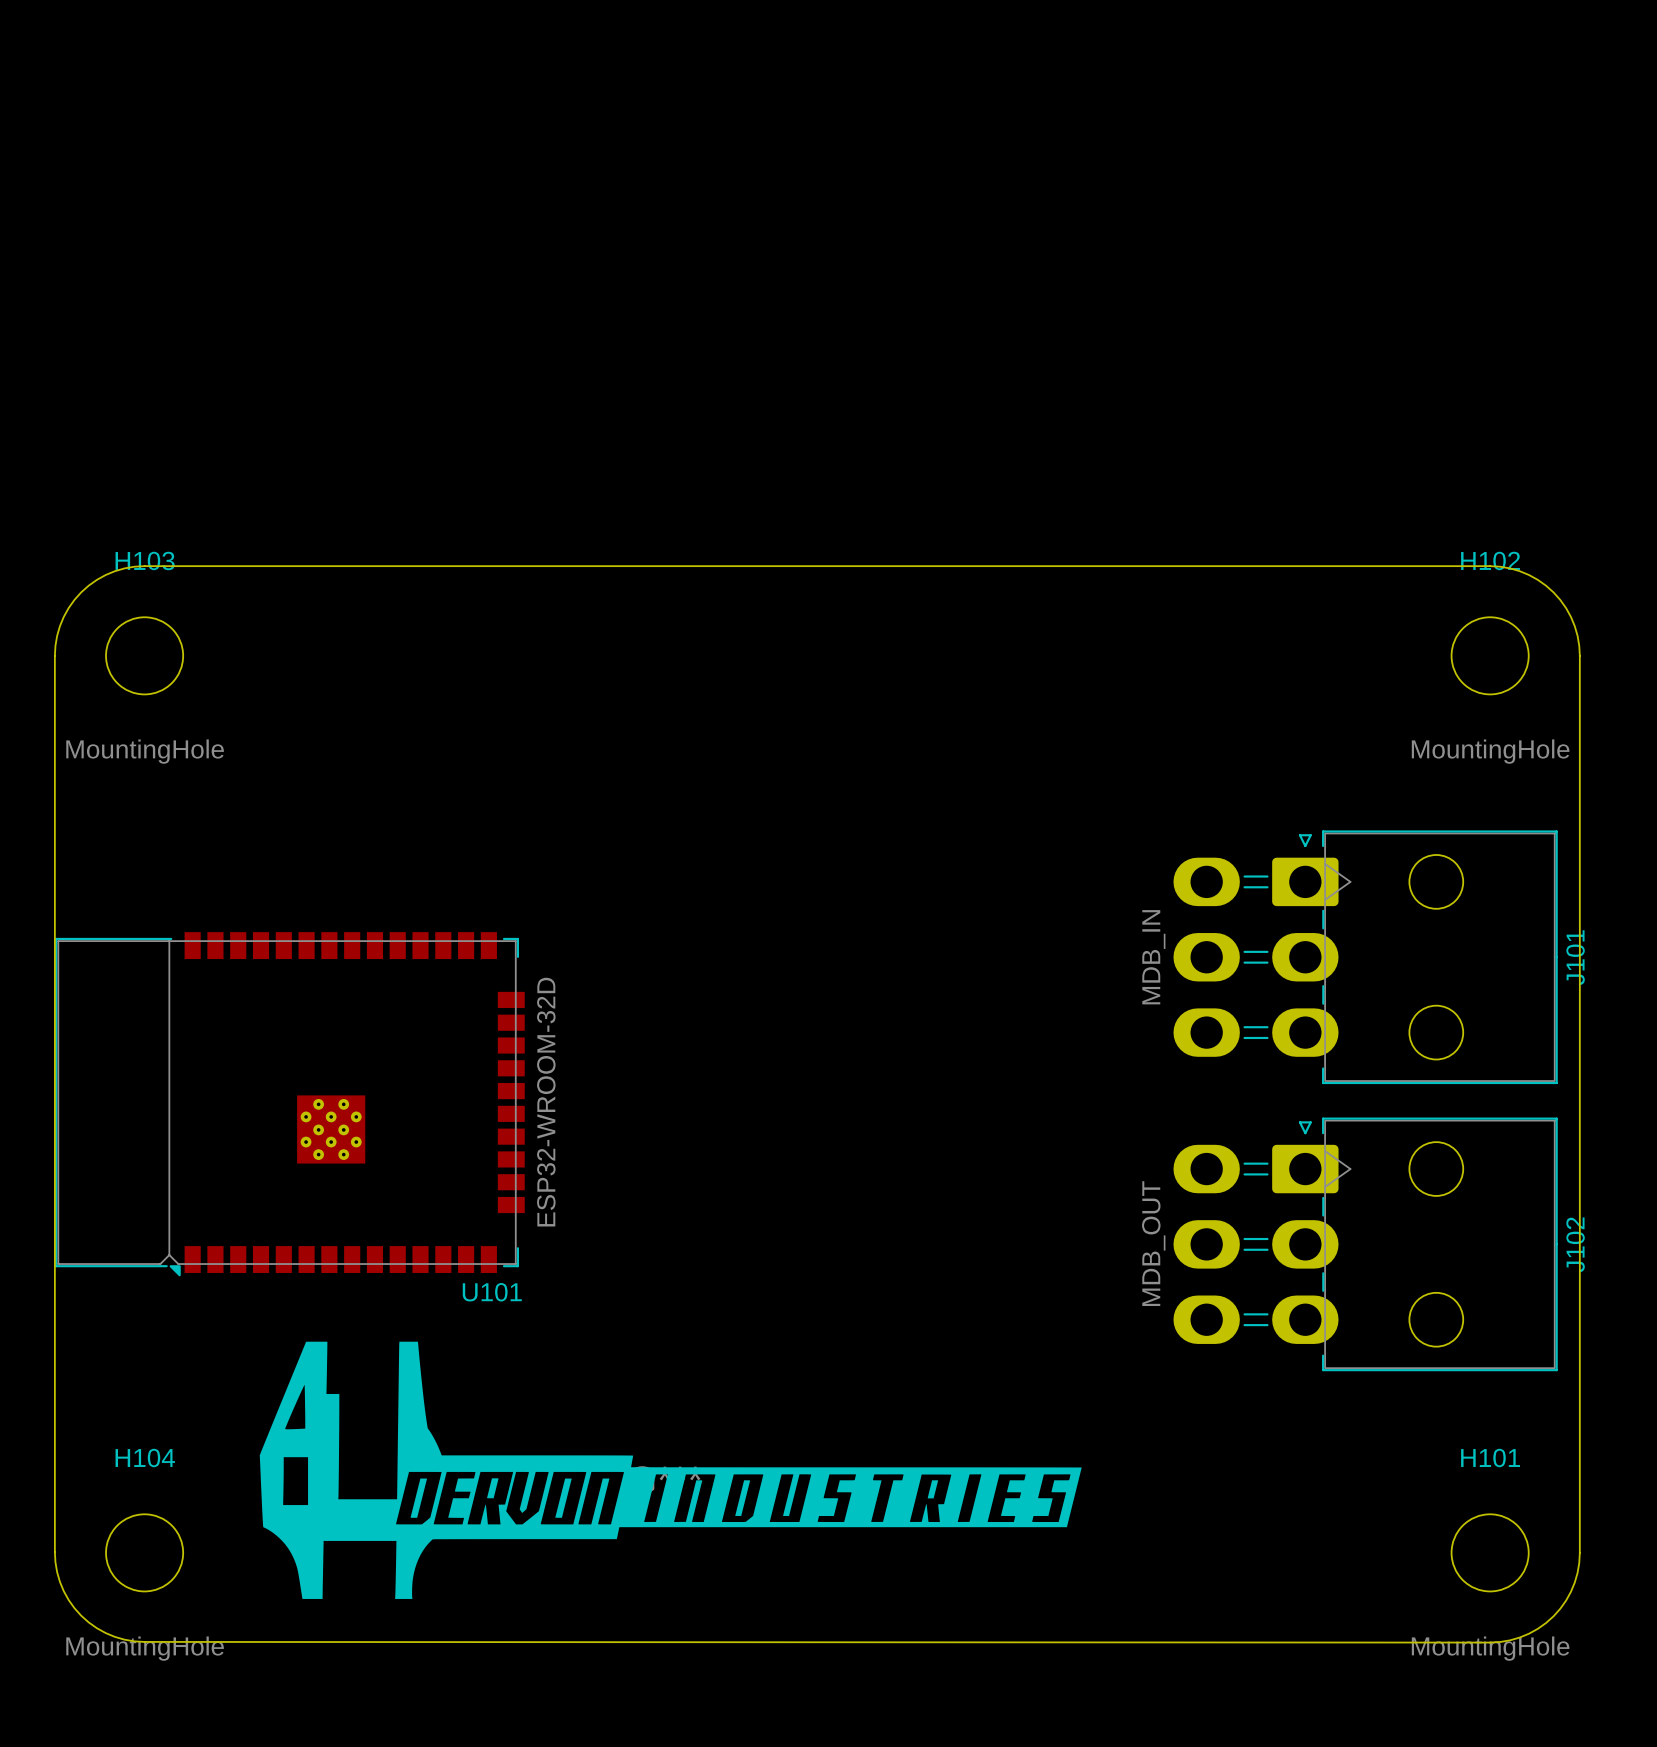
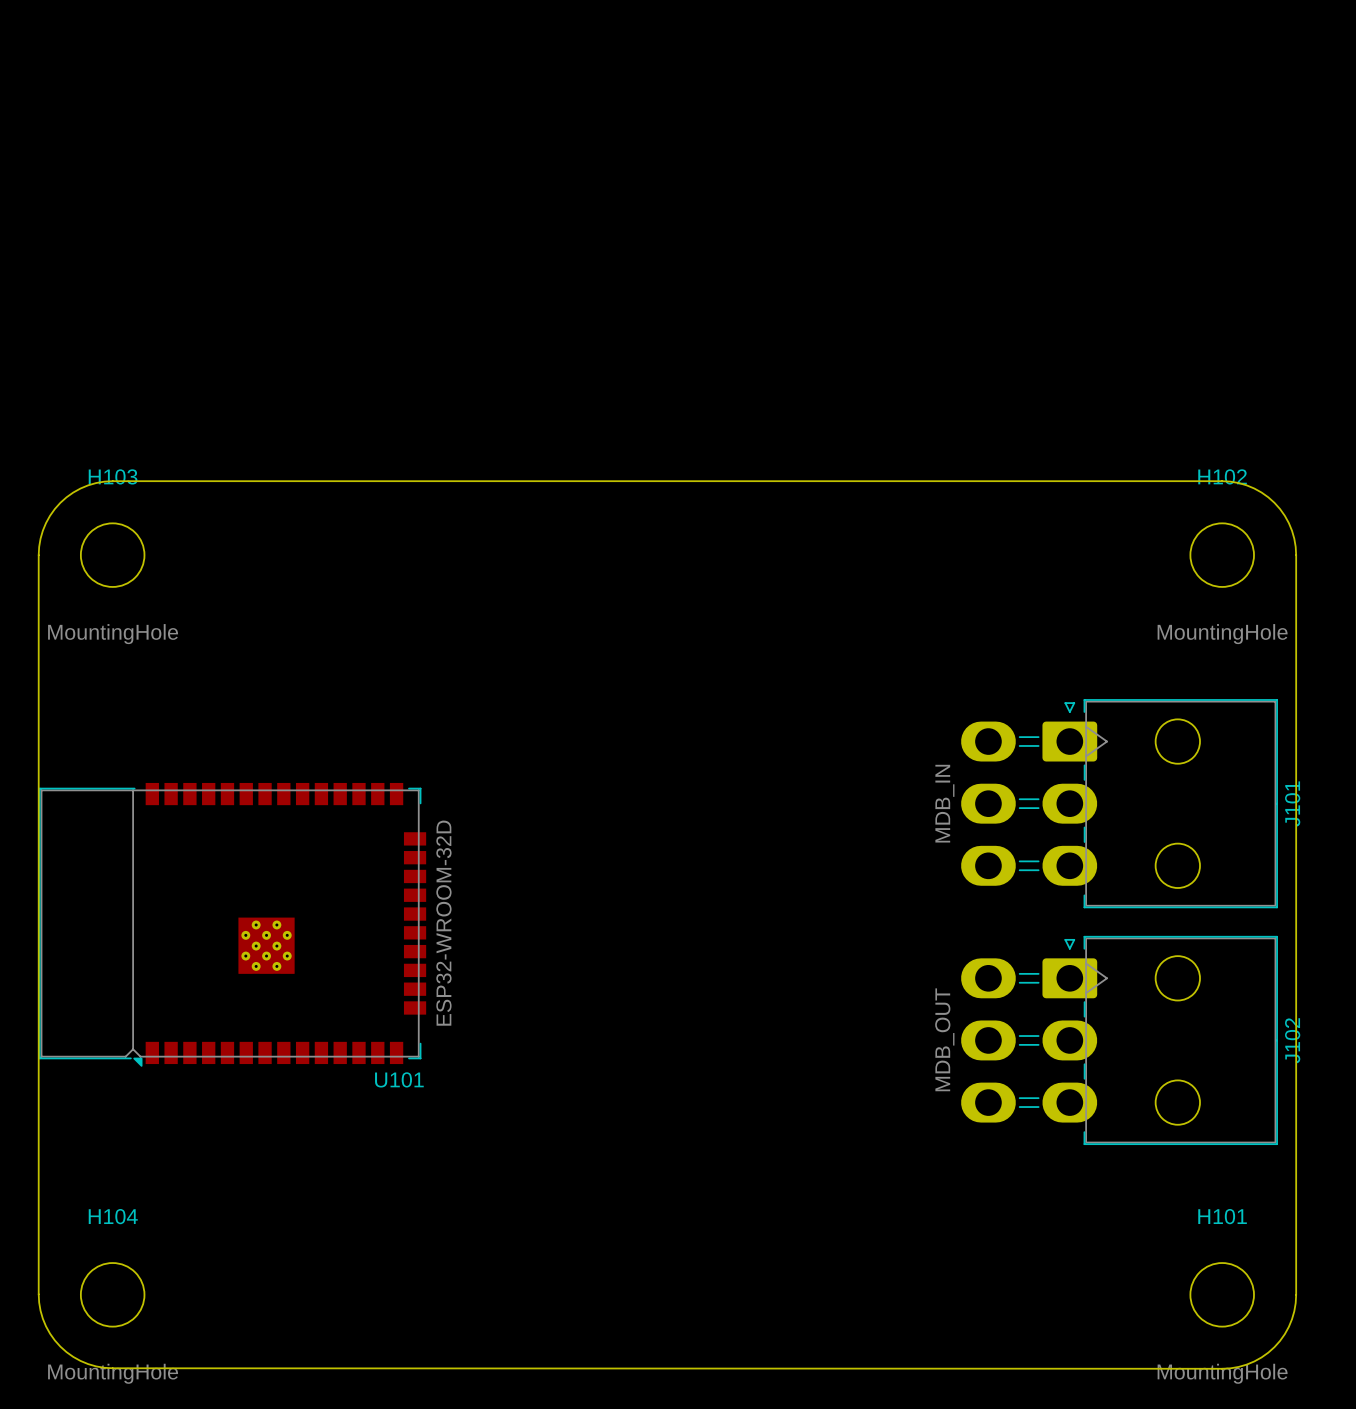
part: (670, 1470) -> none

